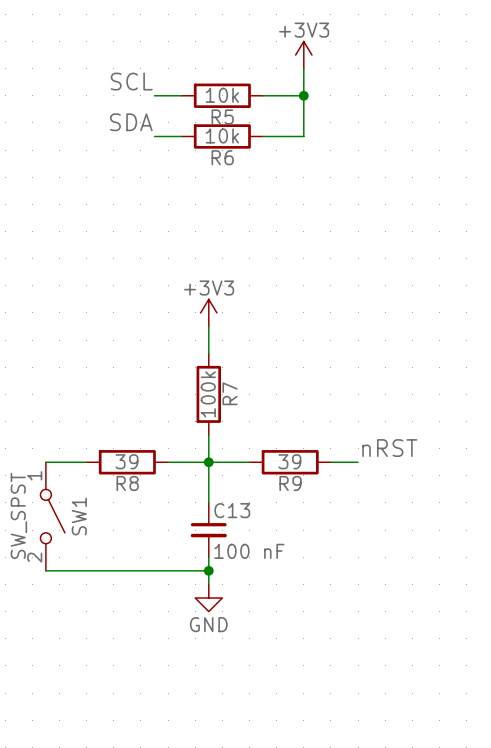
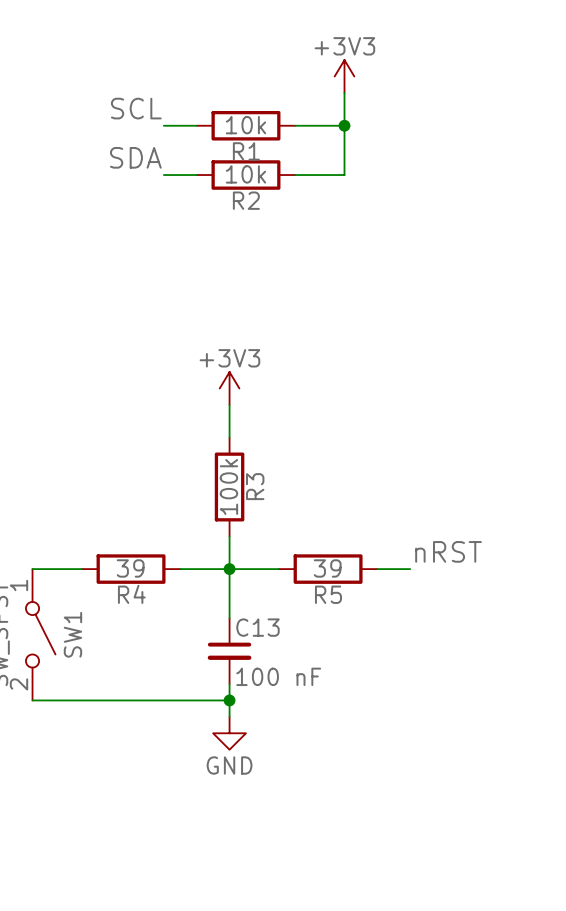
R5 name: R5 (222, 116) -> R1 (246, 151)
R6 name: R6 (222, 157) -> R2 (246, 200)
R7 name: R7 (229, 393) -> R3 (255, 486)
R8 name: R8 (127, 483) -> R4 (131, 594)
R9 name: R9 (290, 483) -> R5 (328, 594)

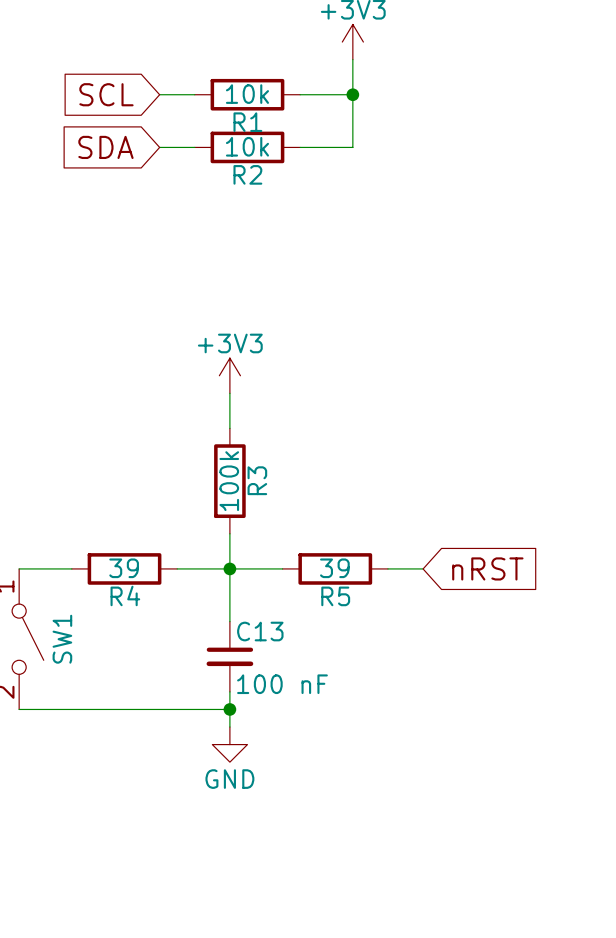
label: SCL (136, 108) -> none
global label: none -> SCL (106, 94)
label: SDA (135, 157) -> none
global label: none -> SDA (105, 147)
label: nRST (448, 551) -> none
global label: none -> nRST (487, 568)

